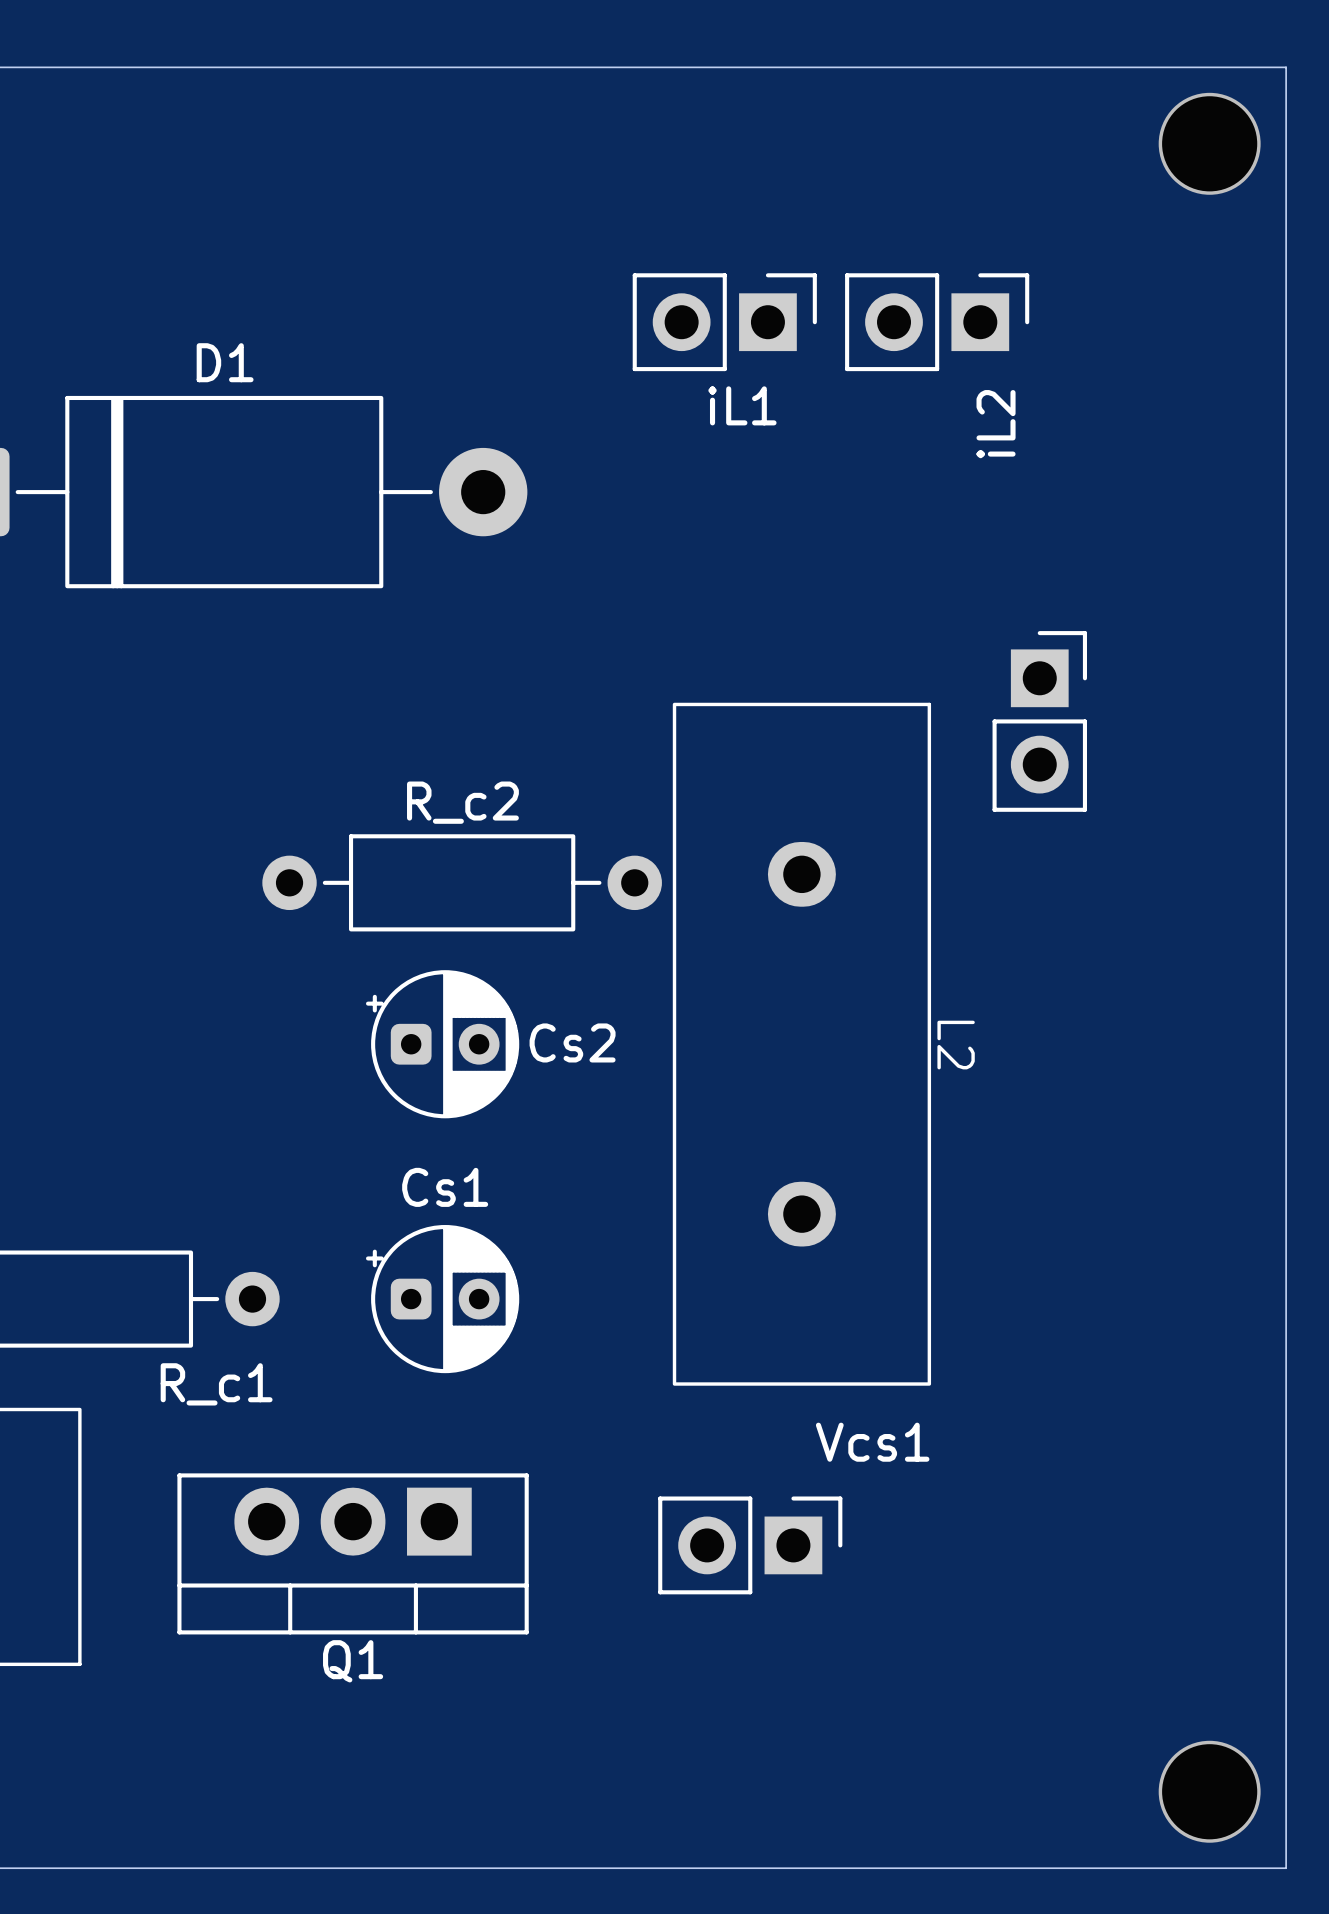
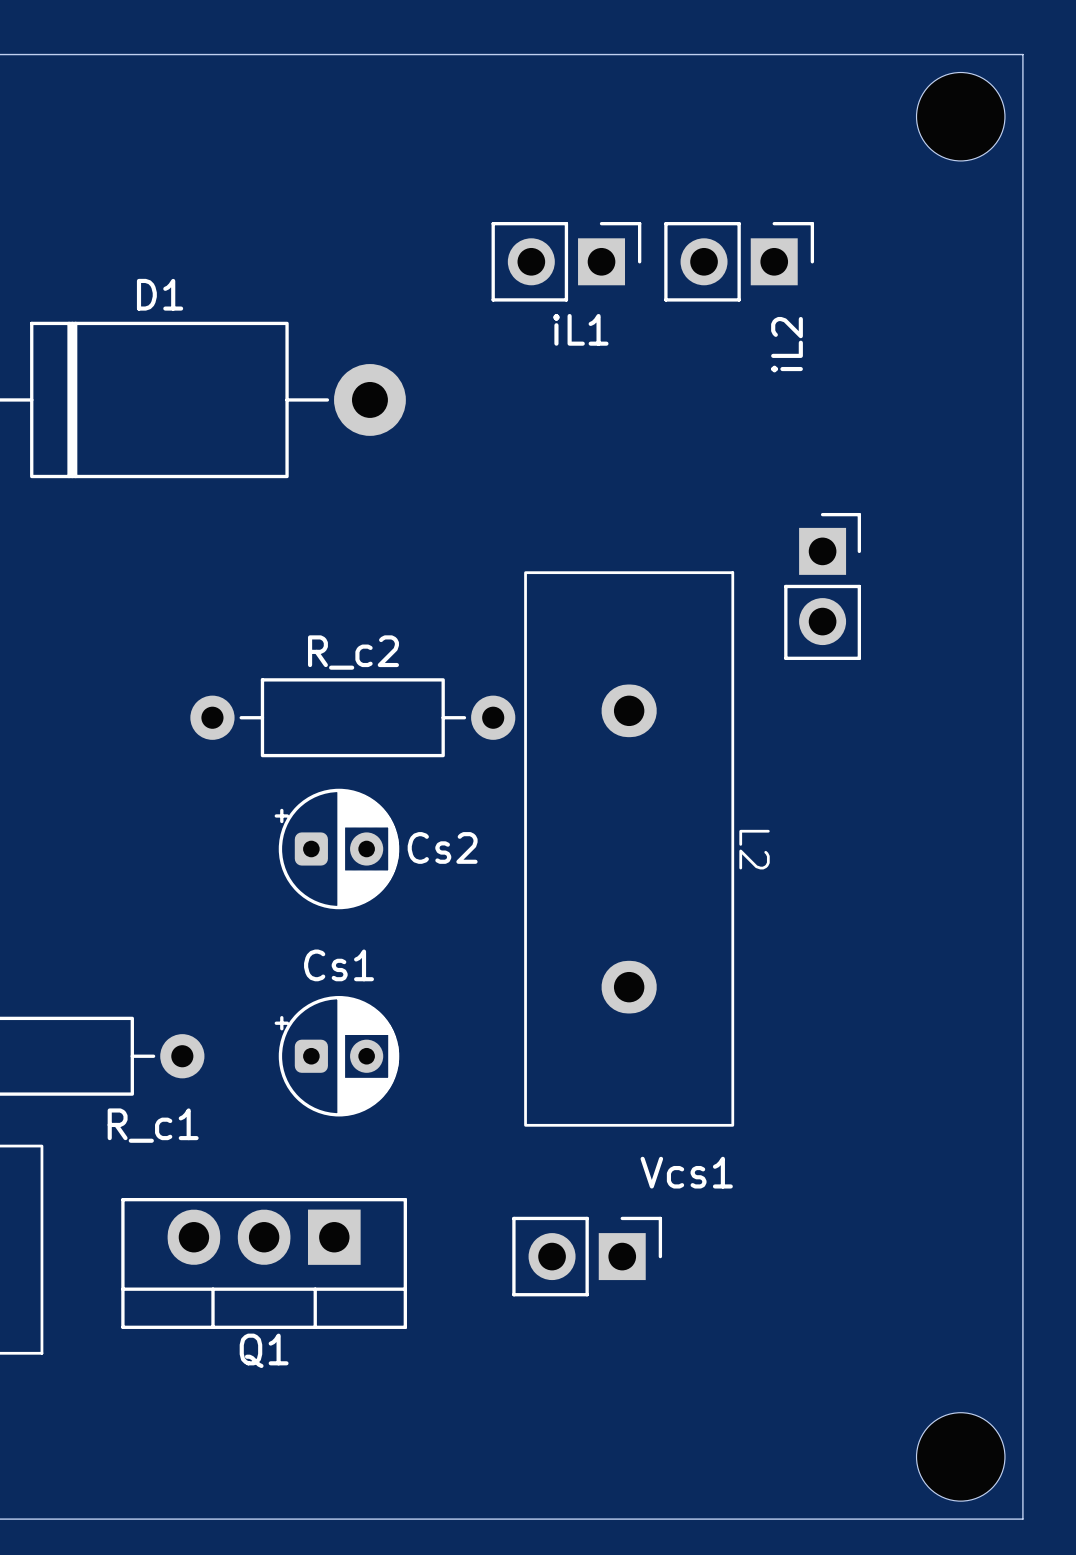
via: (1209, 143) -> none
part: none -> (960, 116)
via: (1209, 1791) -> none
part: none -> (960, 1456)

